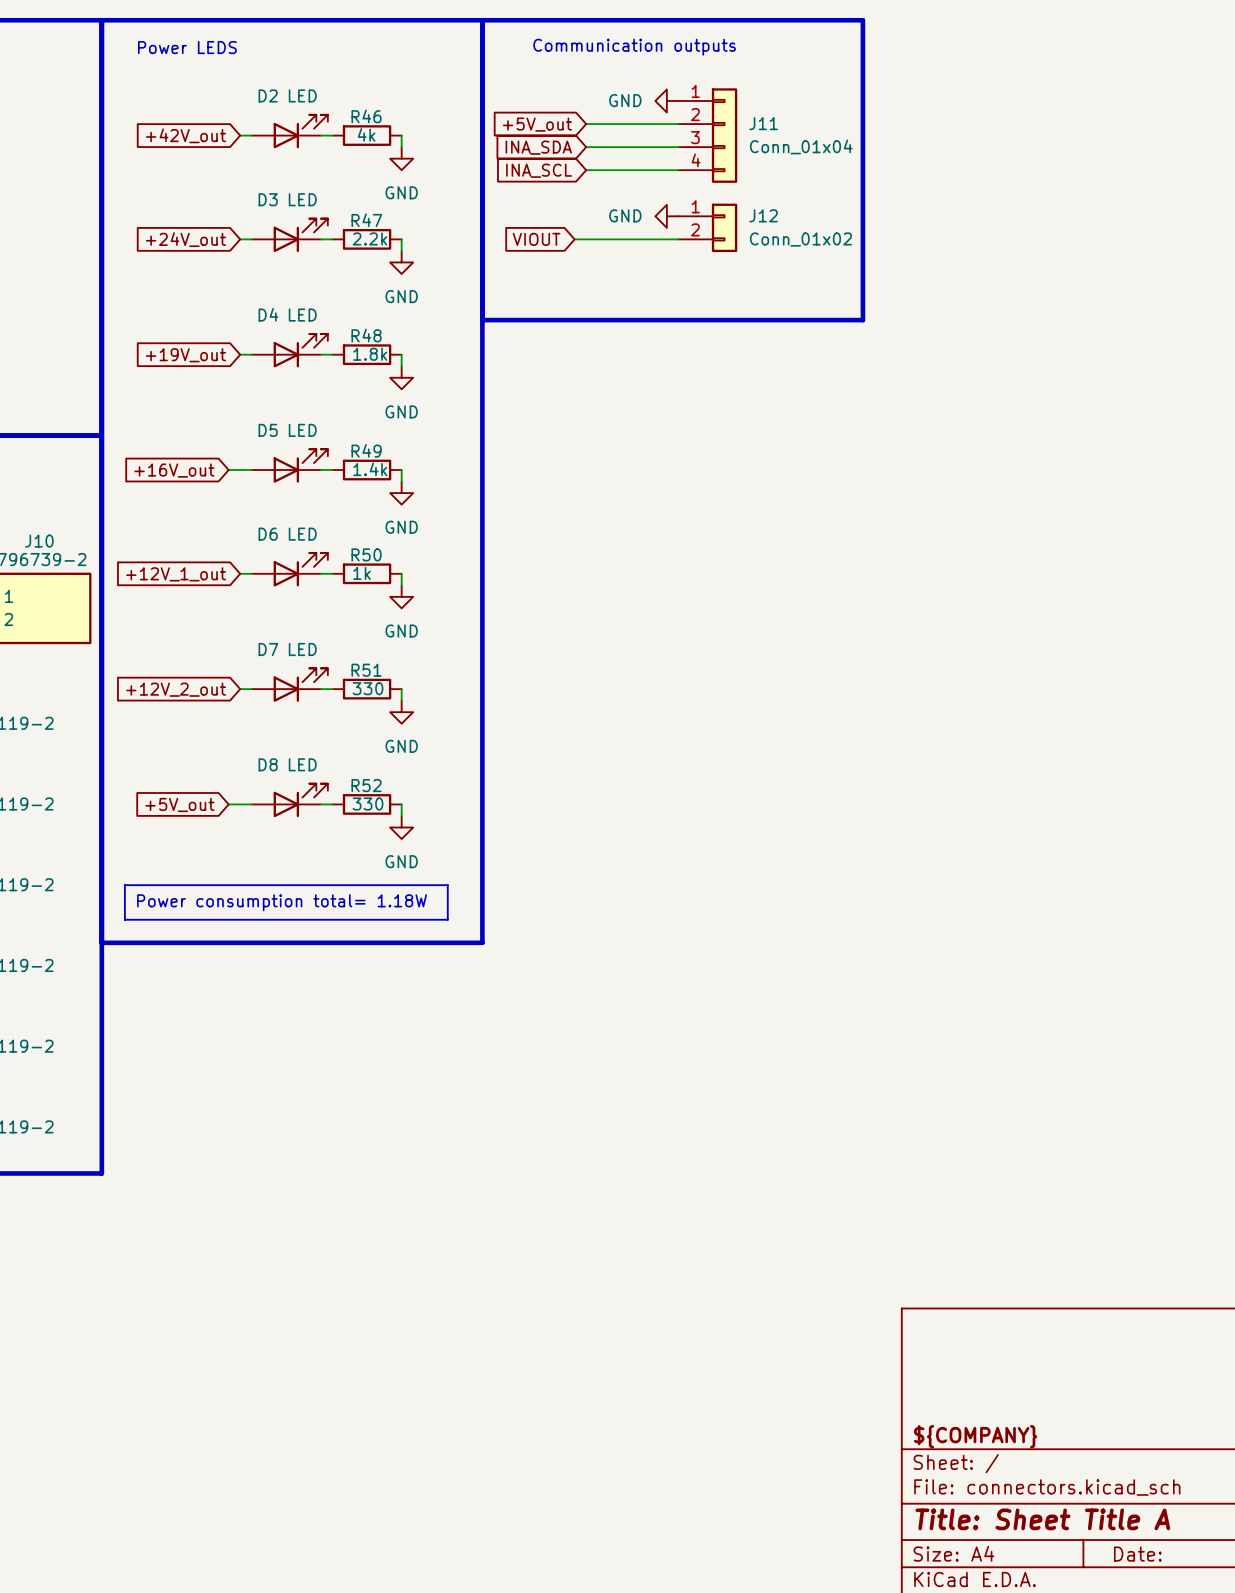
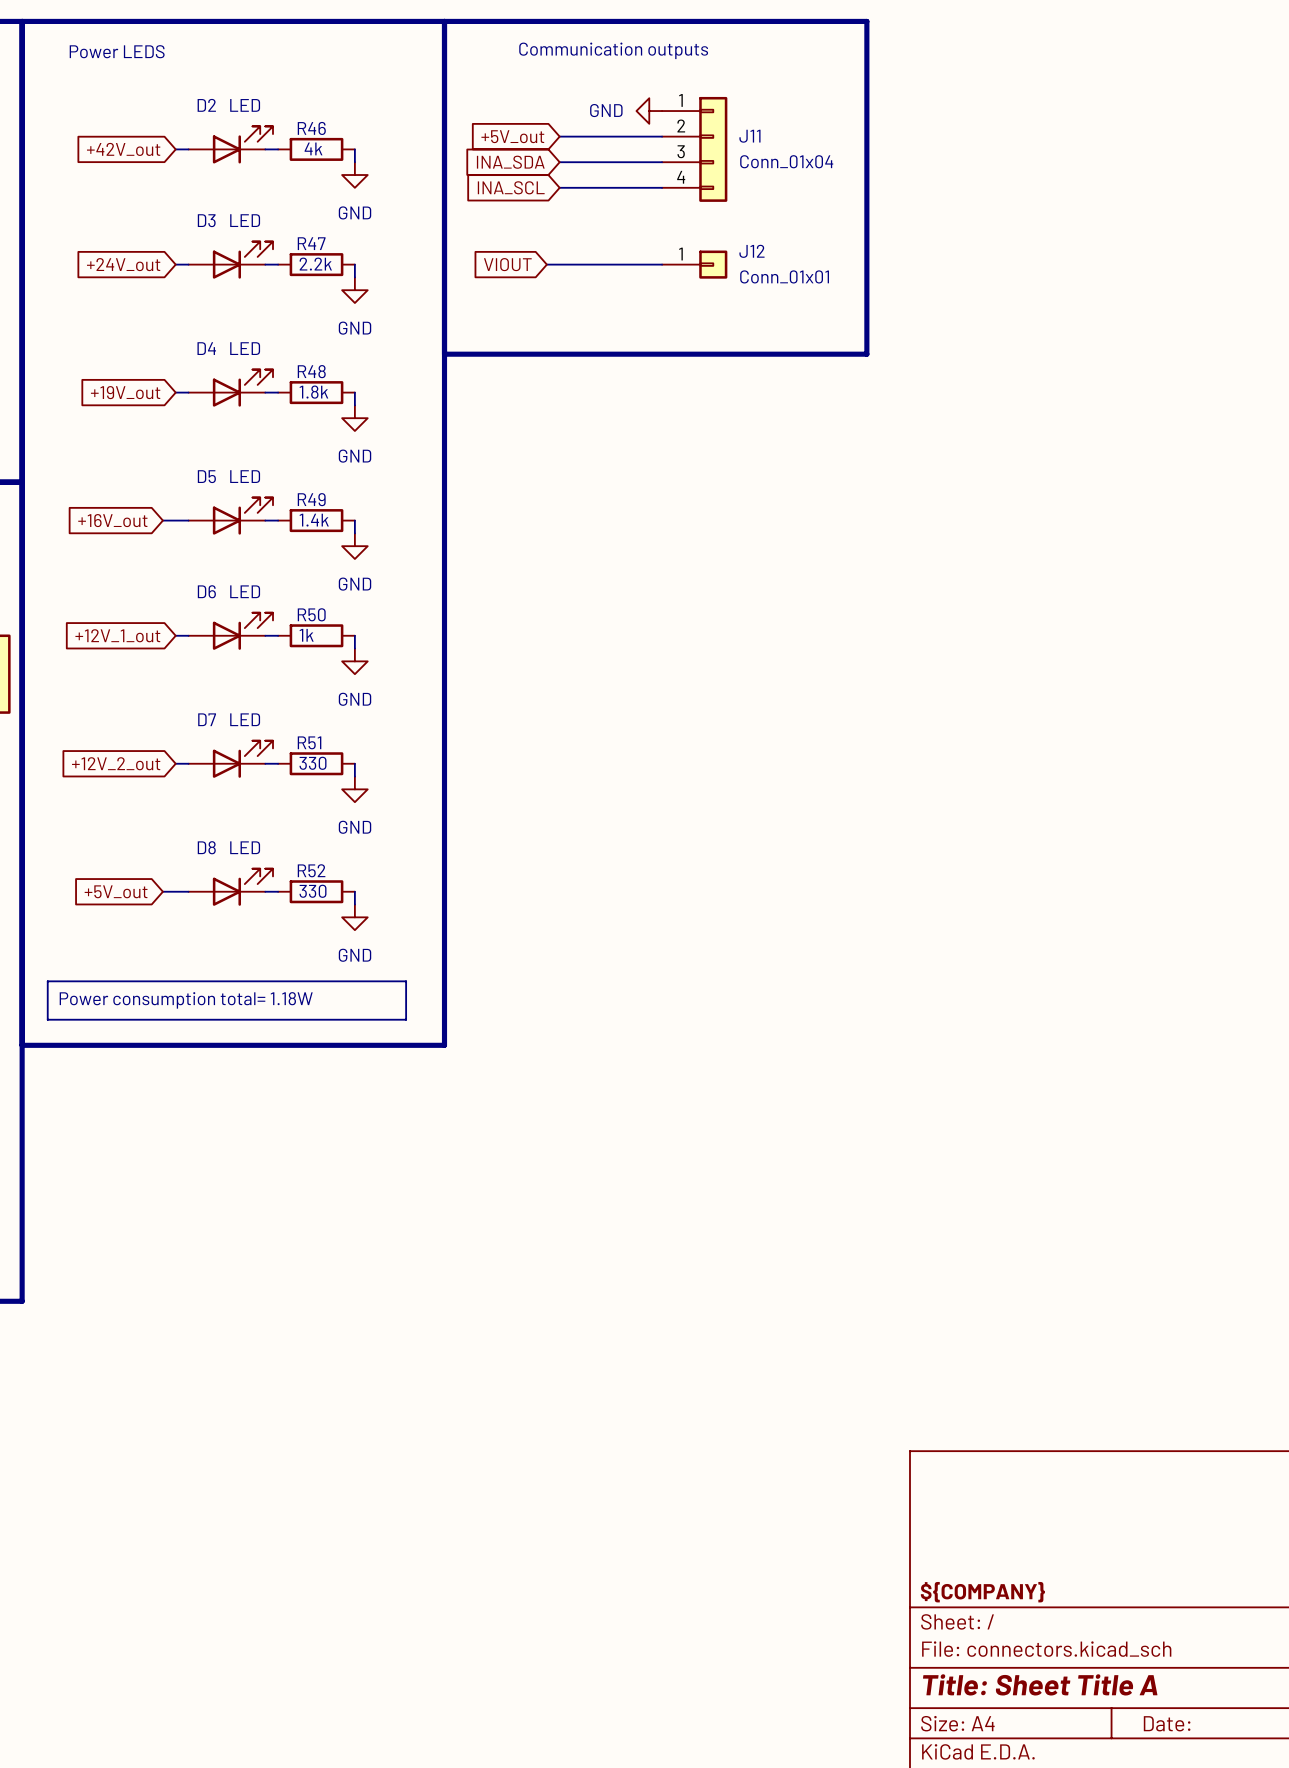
J12 symbol: [678, 203, 738, 253] -> [662, 250, 728, 279]
power symbol: GND (666, 216) -> none
J12 value: Conn_01x02 (800, 239) -> Conn_01x01 (784, 276)

